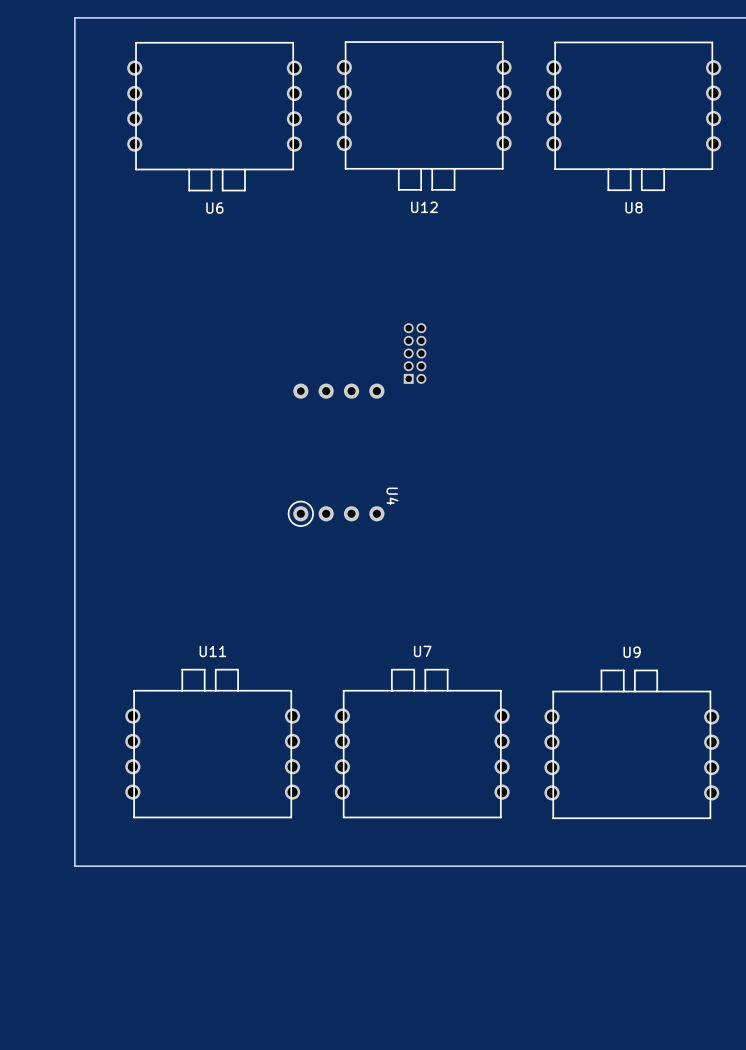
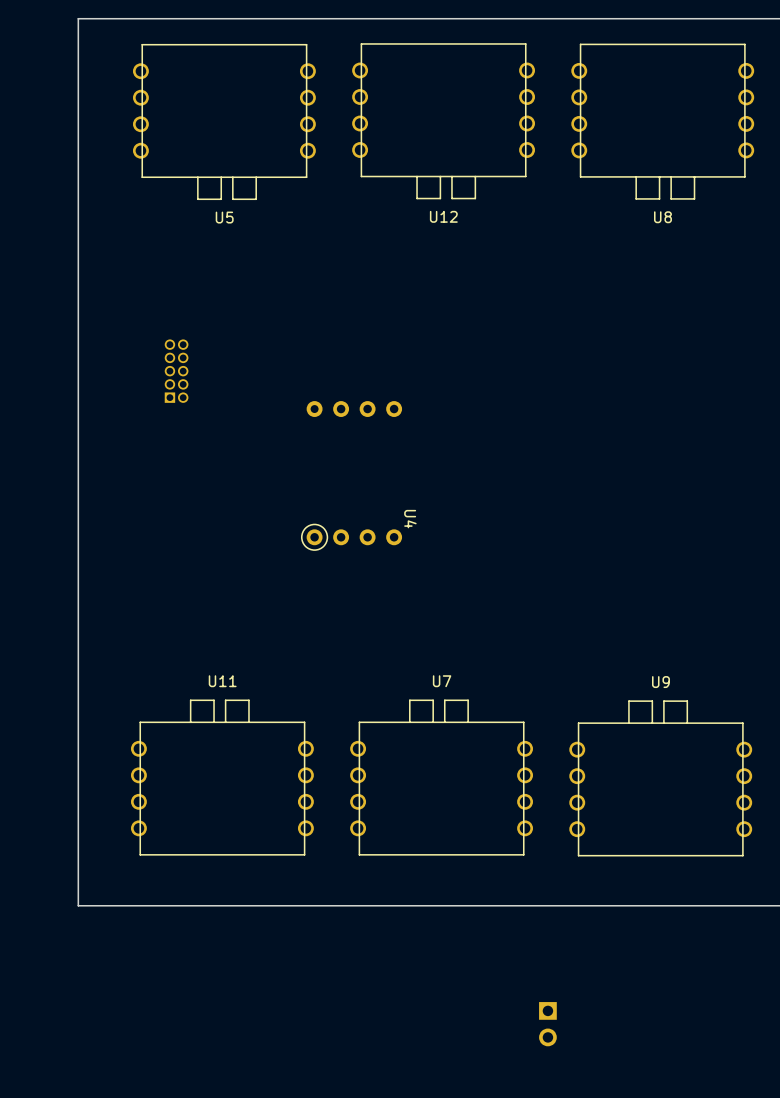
U6 name: U6 (214, 208) -> U5 (224, 217)
part position: (415, 353) -> (176, 371)
part: none -> (547, 1024)

